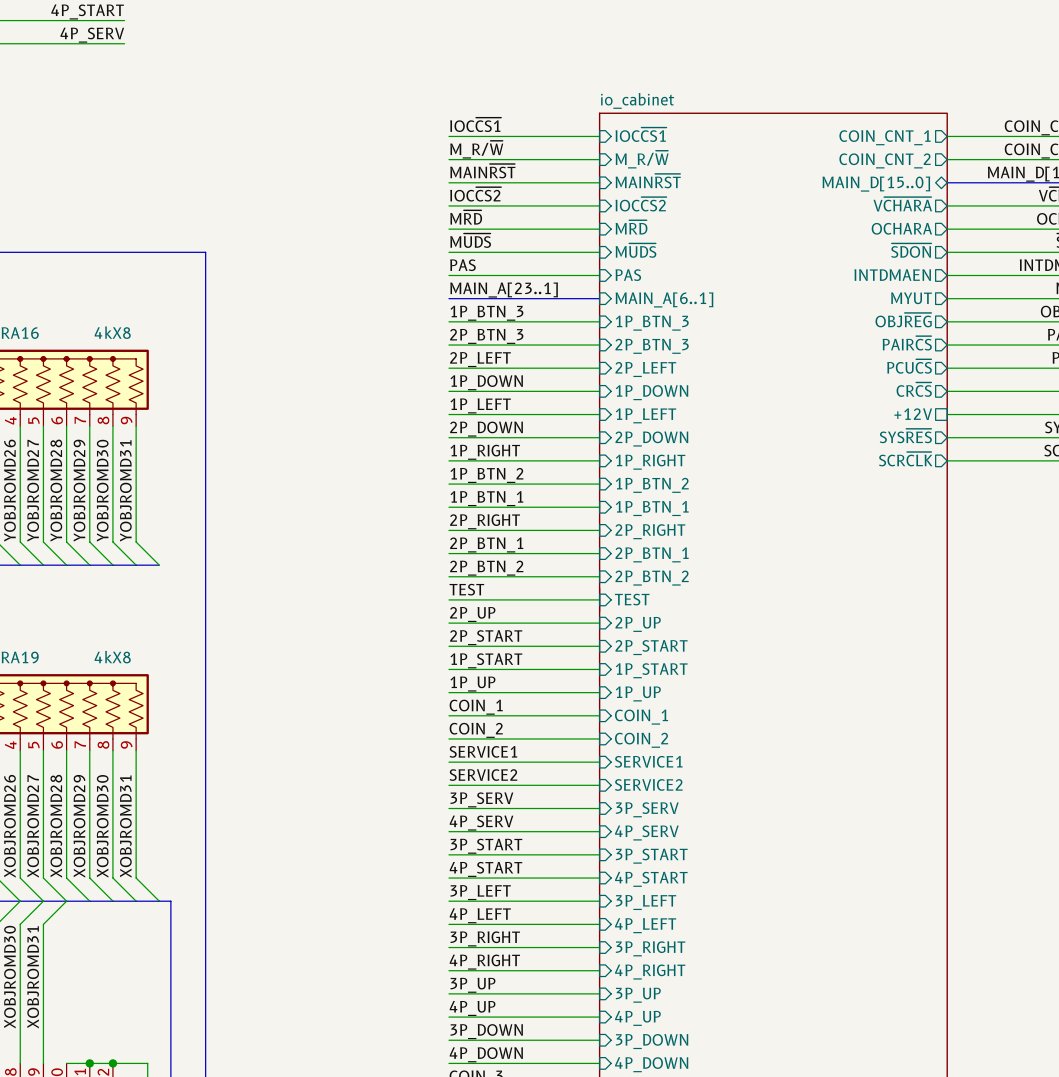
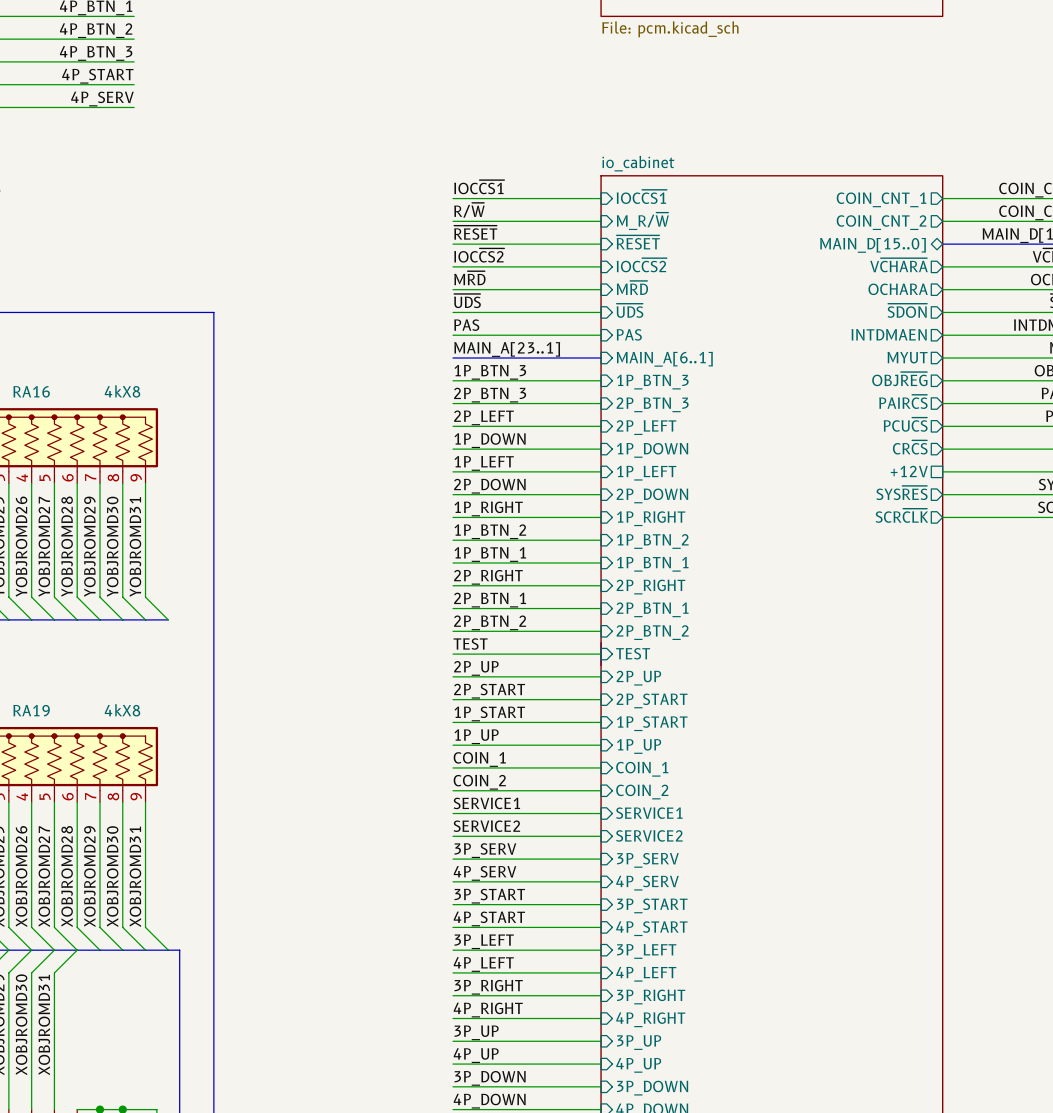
label: M_R/~{W} (476, 149) -> R/~{W} (469, 210)
label: MAIN~{RST} (482, 171) -> ~{RESET} (475, 232)
sheet pin: MAIN~{RST} (648, 181) -> ~{RESET} (638, 242)
label: M~{UDS} (470, 240) -> ~{UDS} (467, 301)
sheet pin: M~{UDS} (635, 250) -> ~{UDS} (629, 310)

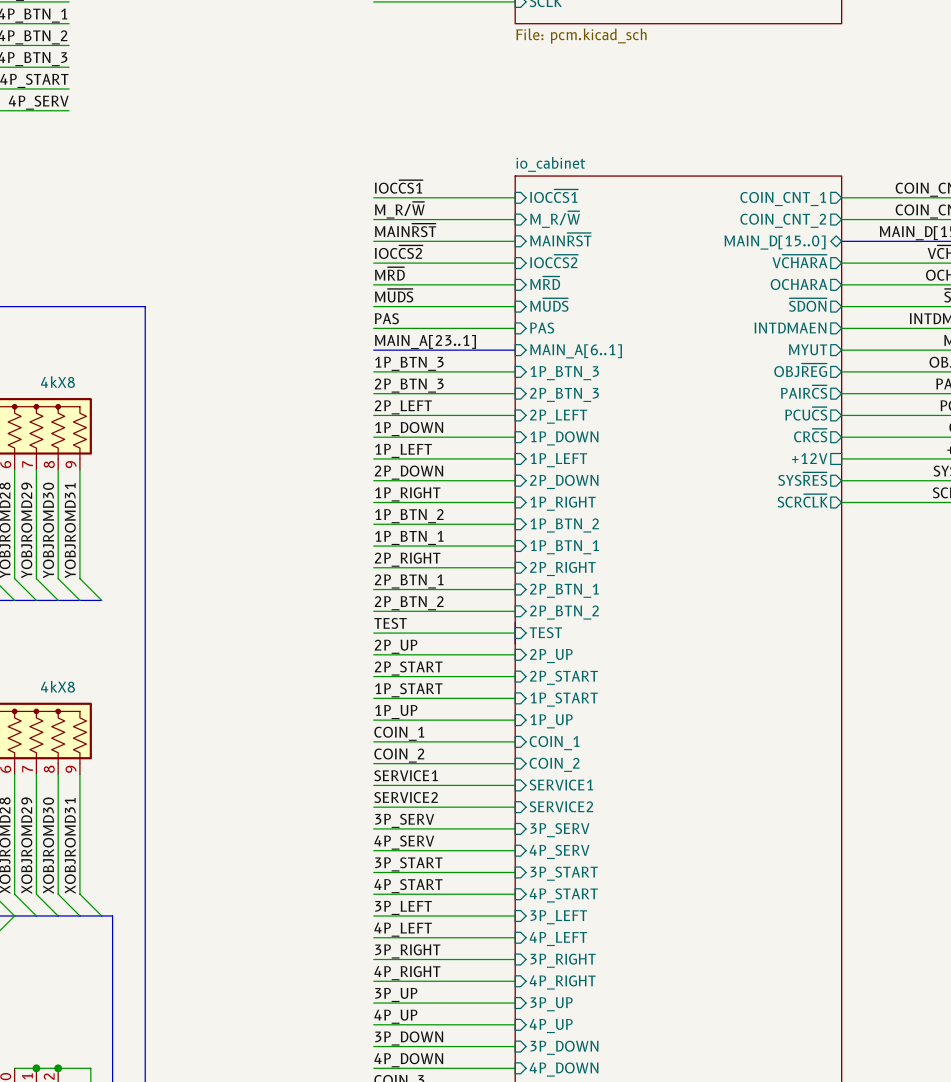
label: R/~{W} (469, 210) -> M_R/~{W} (399, 210)
label: ~{RESET} (475, 232) -> MAIN~{RST} (405, 230)
sheet pin: ~{RESET} (638, 242) -> MAIN~{RST} (560, 239)
label: ~{UDS} (467, 301) -> M~{UDS} (394, 295)
sheet pin: ~{UDS} (629, 310) -> M~{UDS} (549, 305)

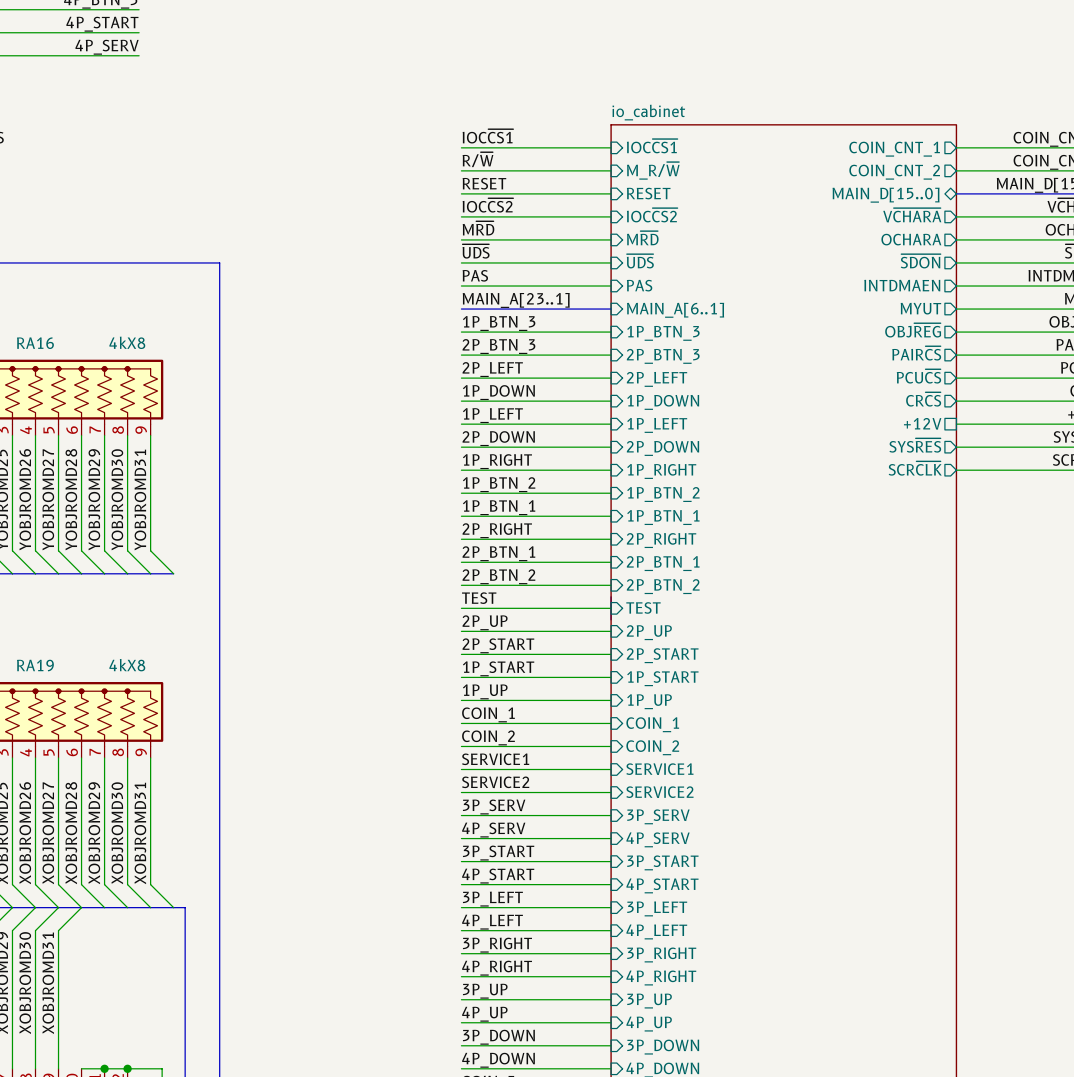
label: M_R/~{W} (399, 210) -> R/~{W} (477, 159)
label: MAIN~{RST} (405, 230) -> RESET (484, 183)
sheet pin: MAIN~{RST} (560, 239) -> RESET (648, 193)
label: M~{UDS} (394, 295) -> ~{UDS} (476, 251)
sheet pin: M~{UDS} (549, 305) -> ~{UDS} (640, 261)

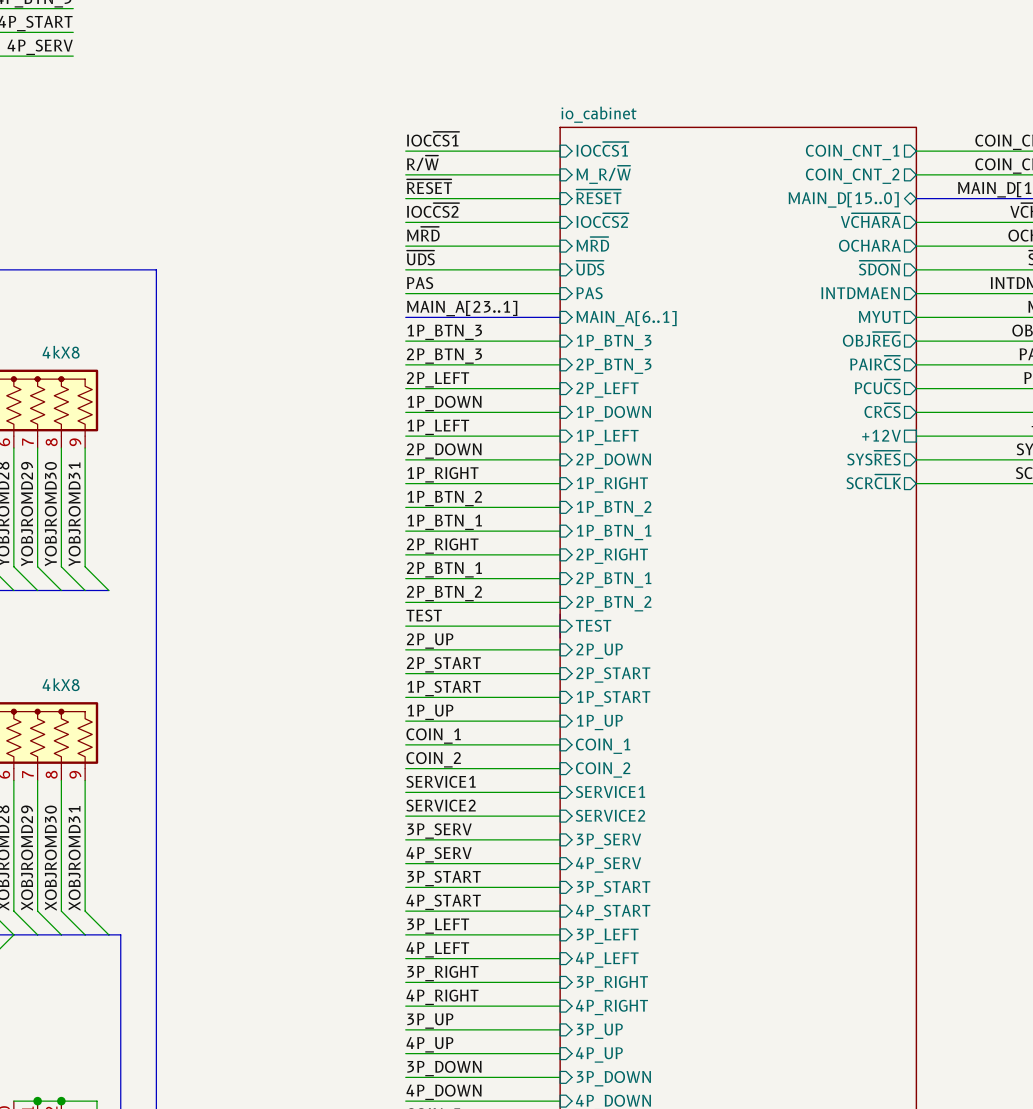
label: RESET (484, 183) -> ~{RESET} (429, 186)
sheet pin: RESET (648, 193) -> ~{RESET} (598, 196)

